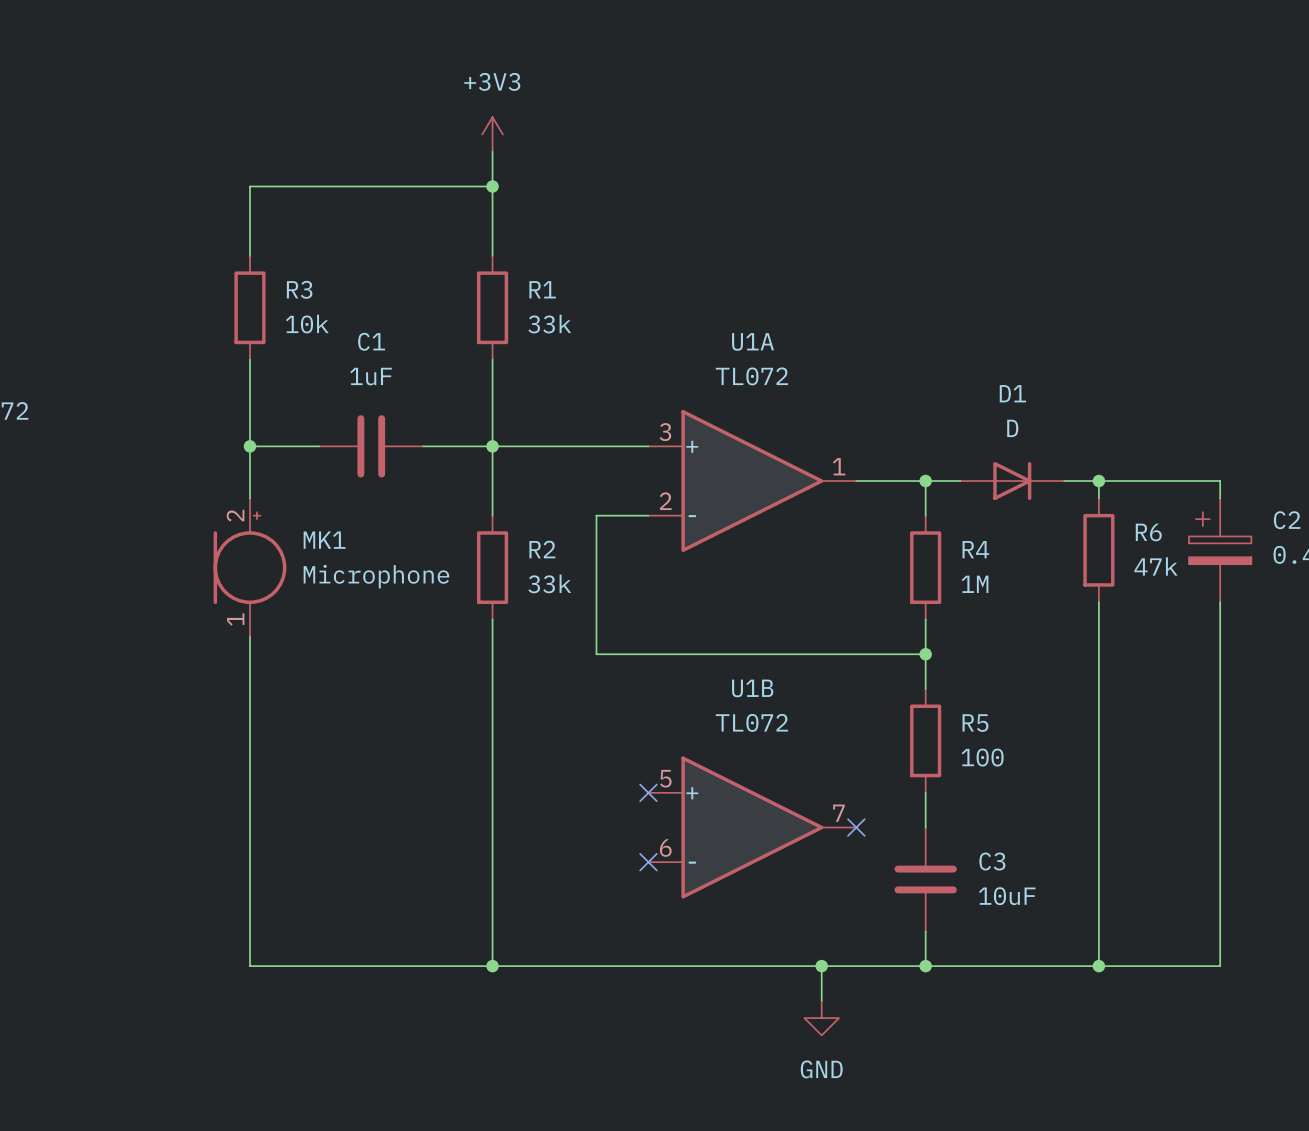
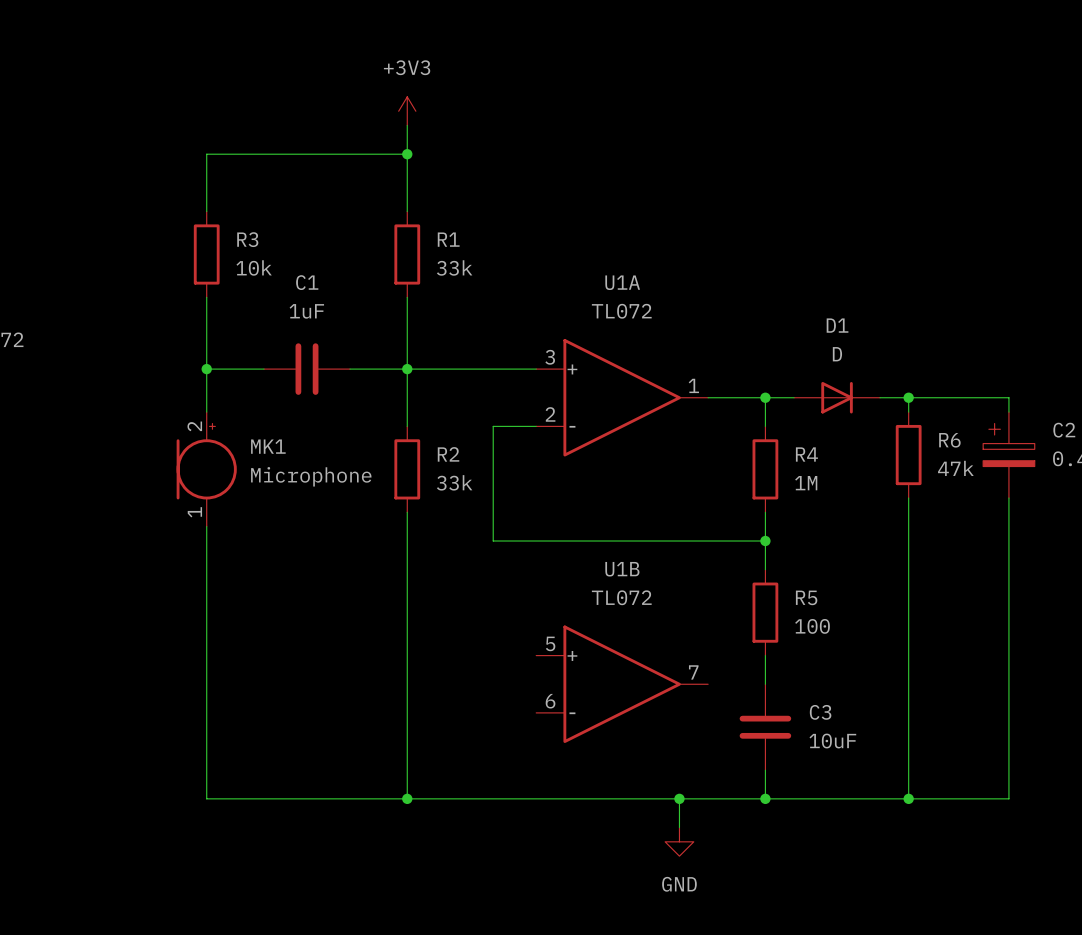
no-connect mark: (648, 792) -> none
no-connect mark: (856, 827) -> none
no-connect mark: (648, 862) -> none

